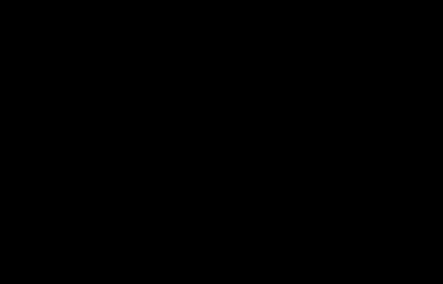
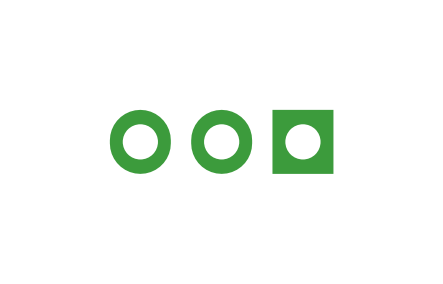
part: none -> (221, 141)

